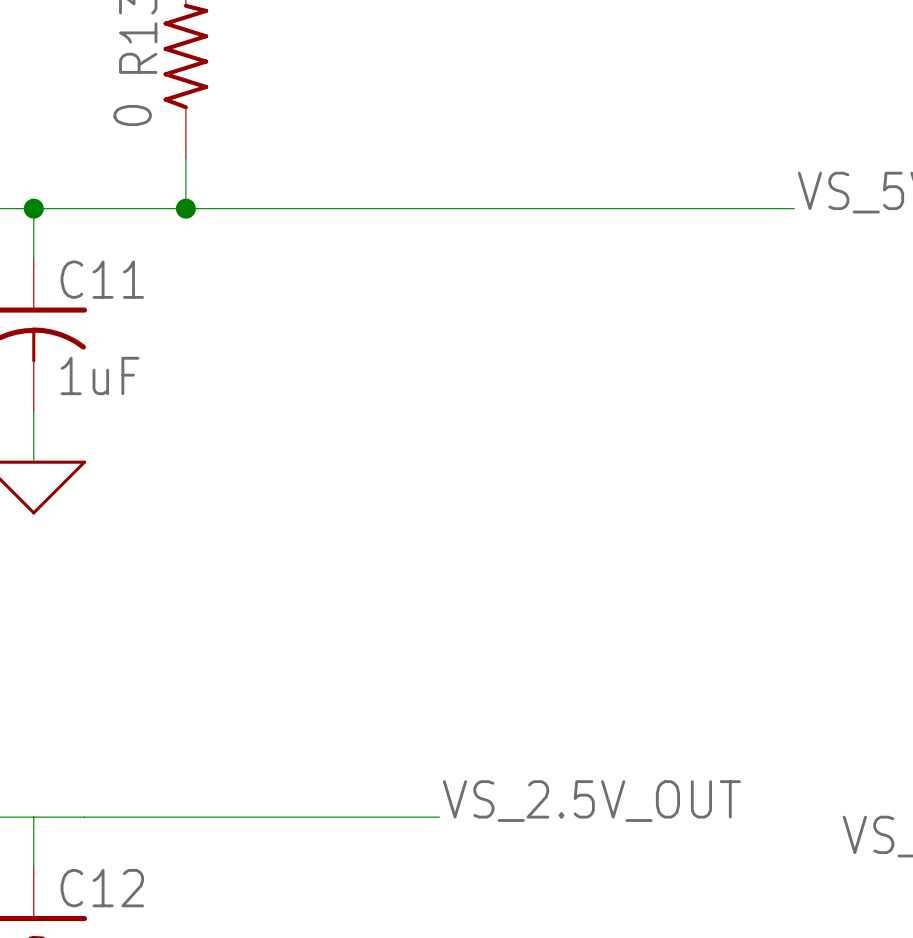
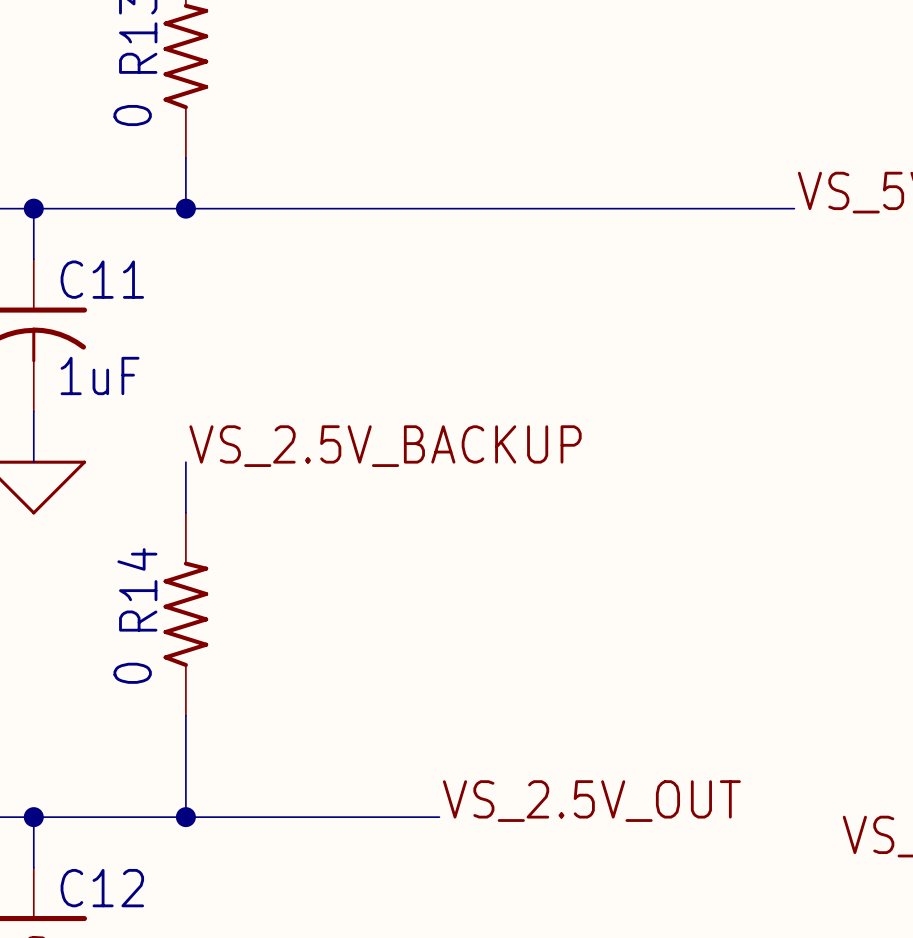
label: none -> VS_2.5V_BACKUP (385, 446)
wire: none -> (185, 462) (185, 512)
R14: none -> 0 (185, 614)
wire: none -> (185, 715) (185, 817)
junction: none -> (33, 817)
junction: none -> (185, 817)

